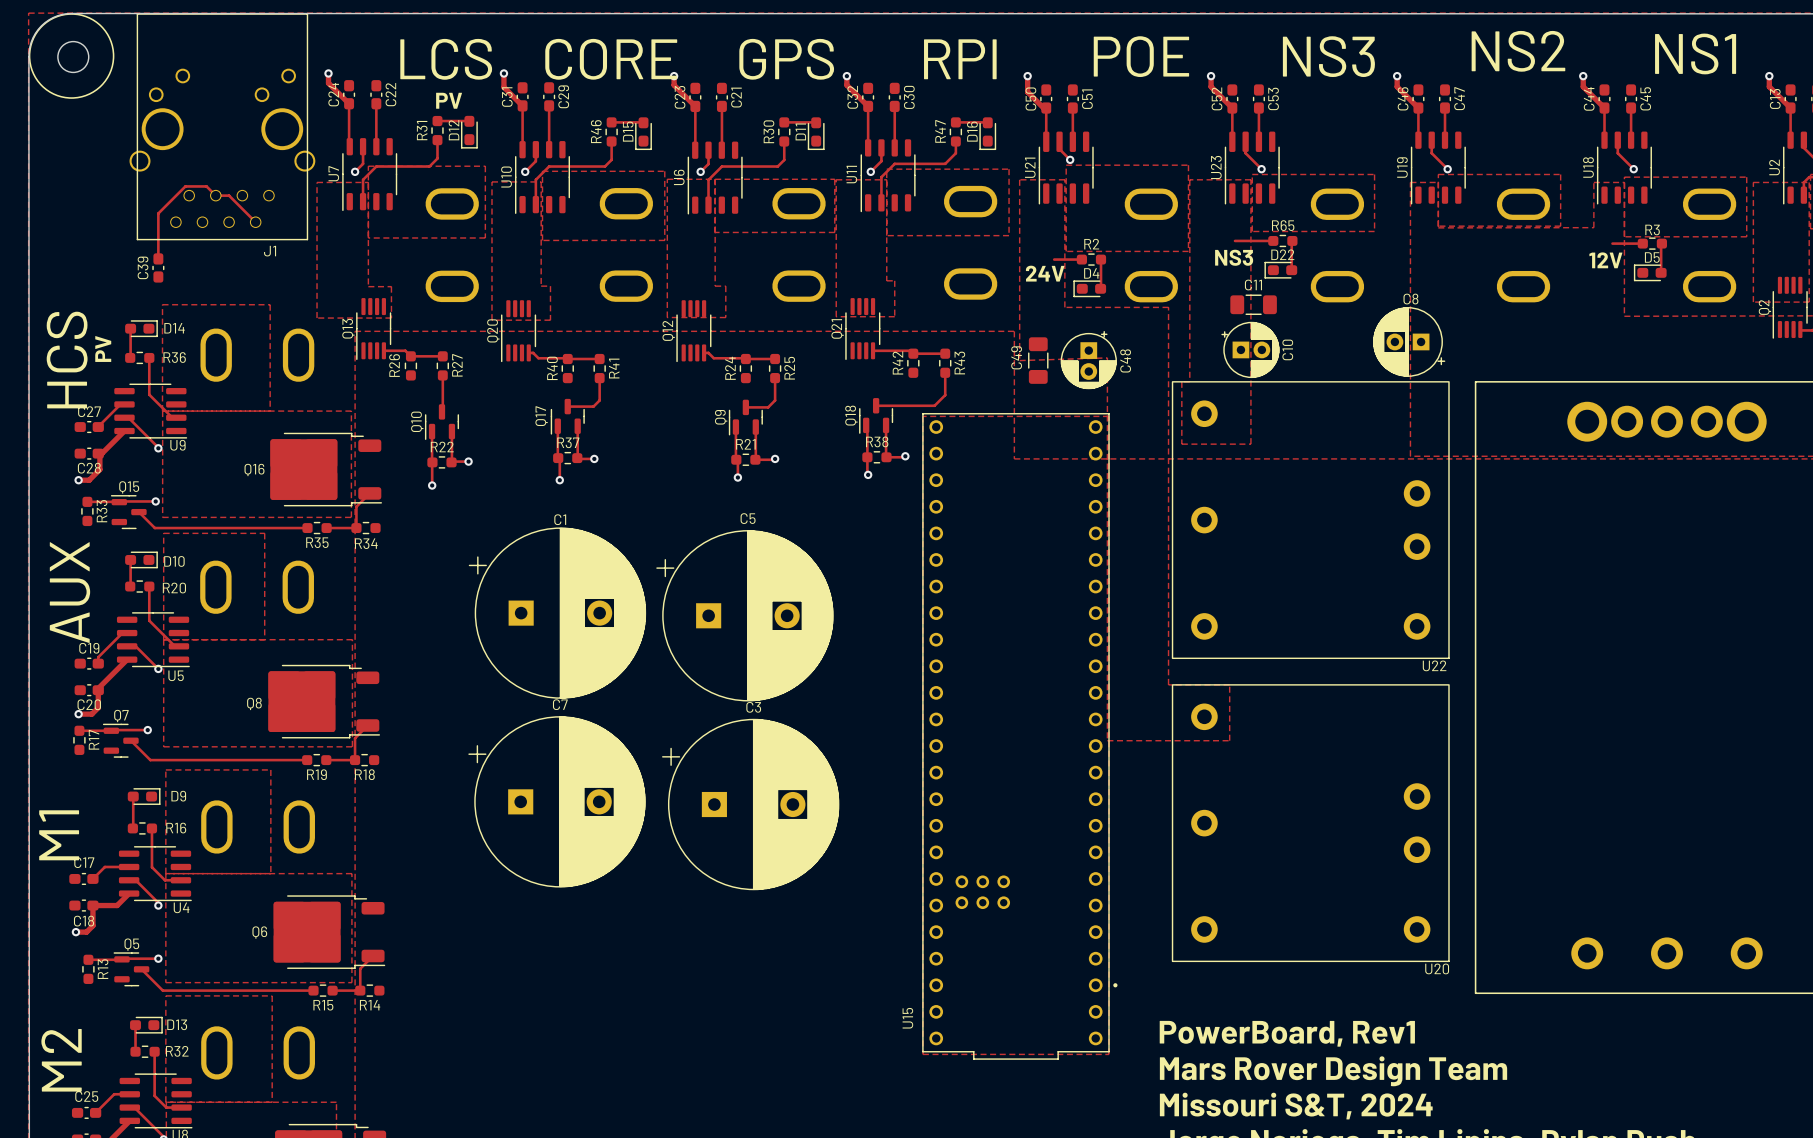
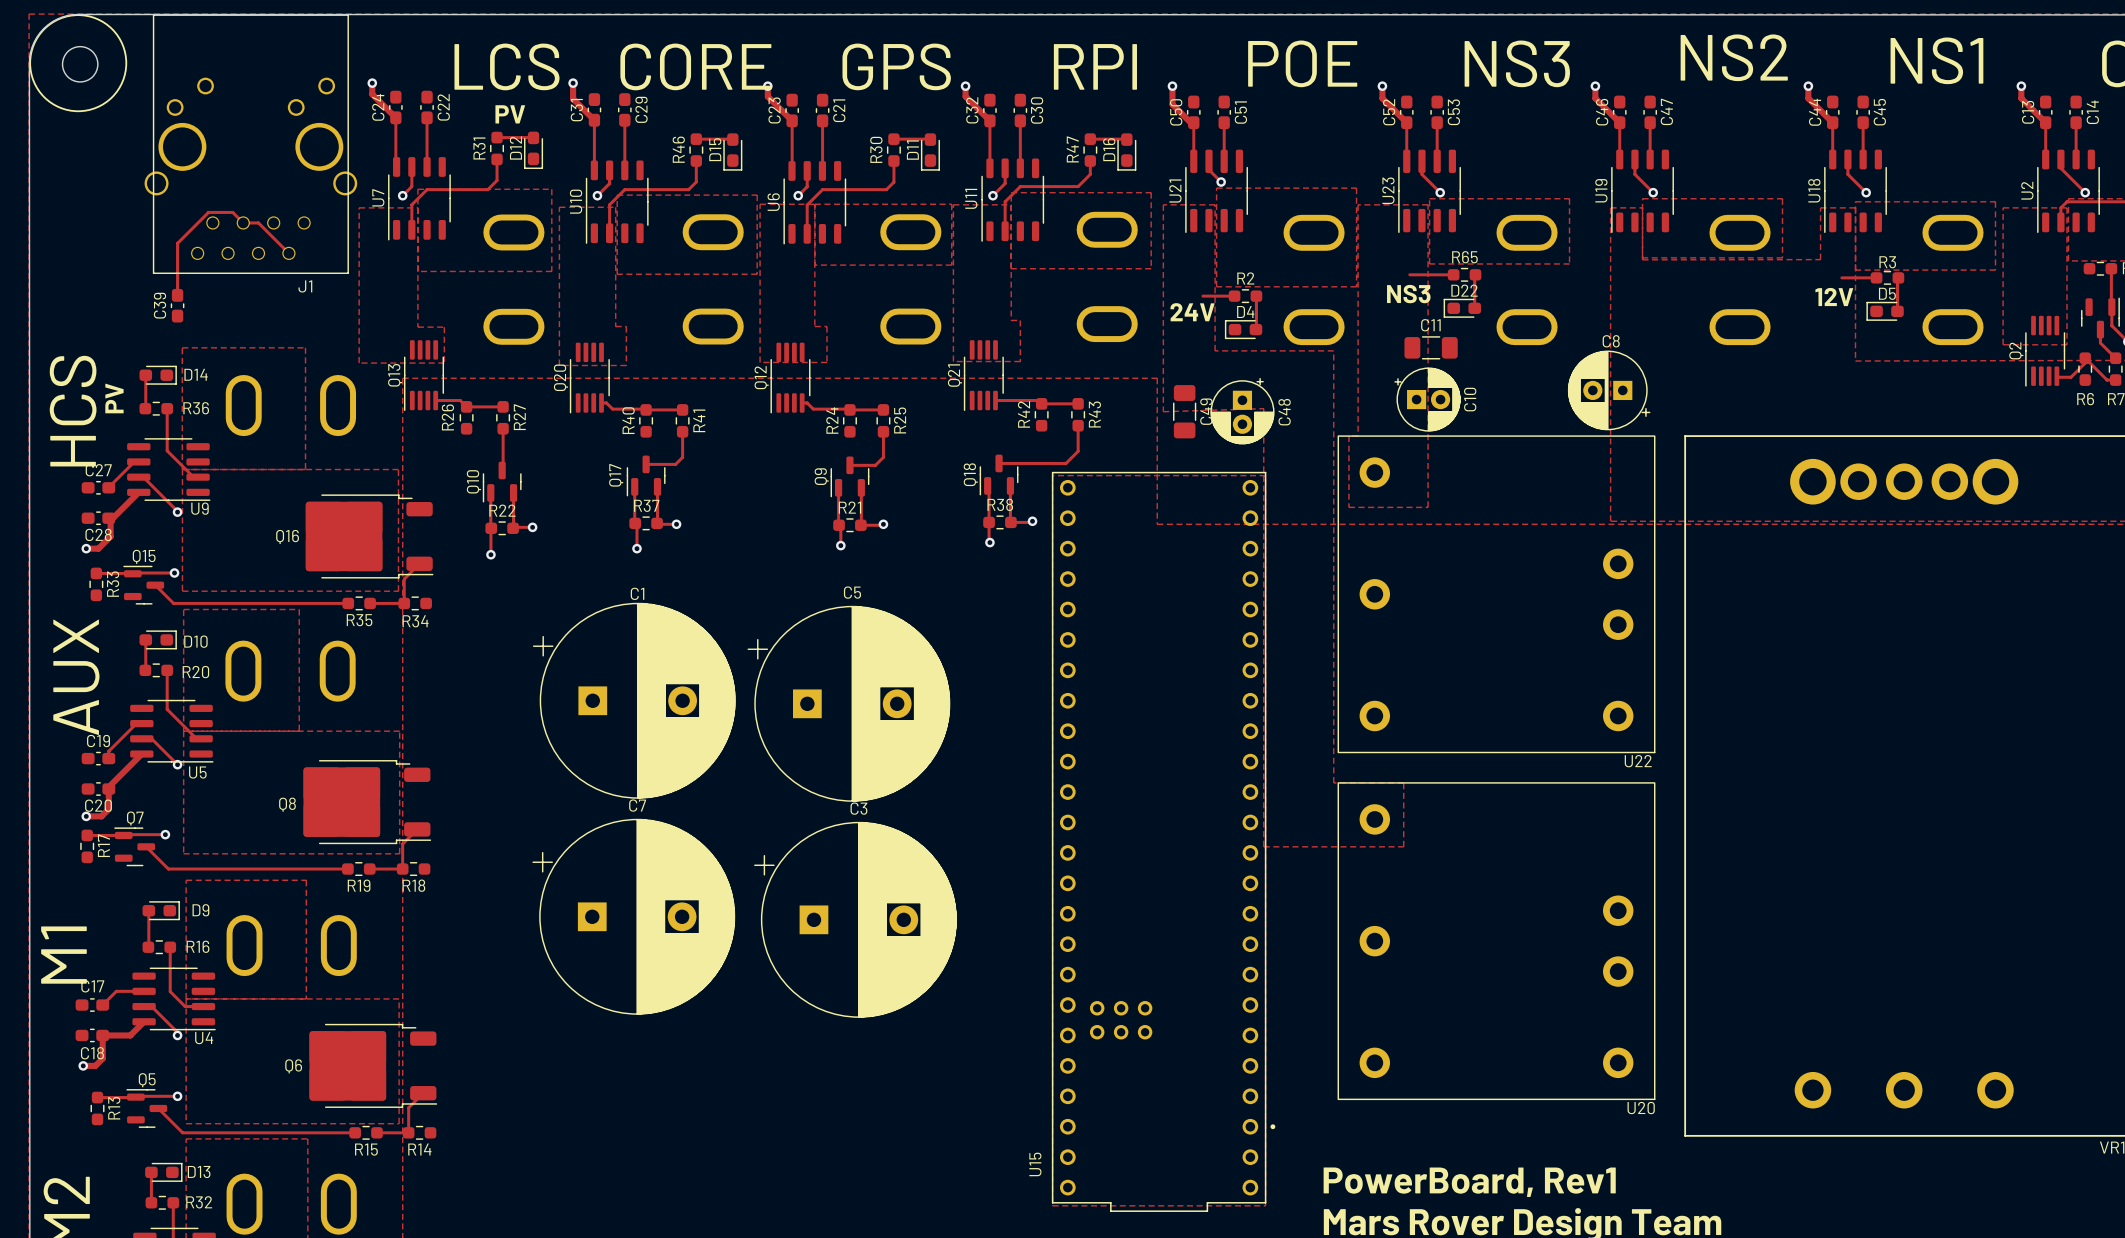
C49 name position: C49 (1016, 357) -> C49 (1206, 411)

